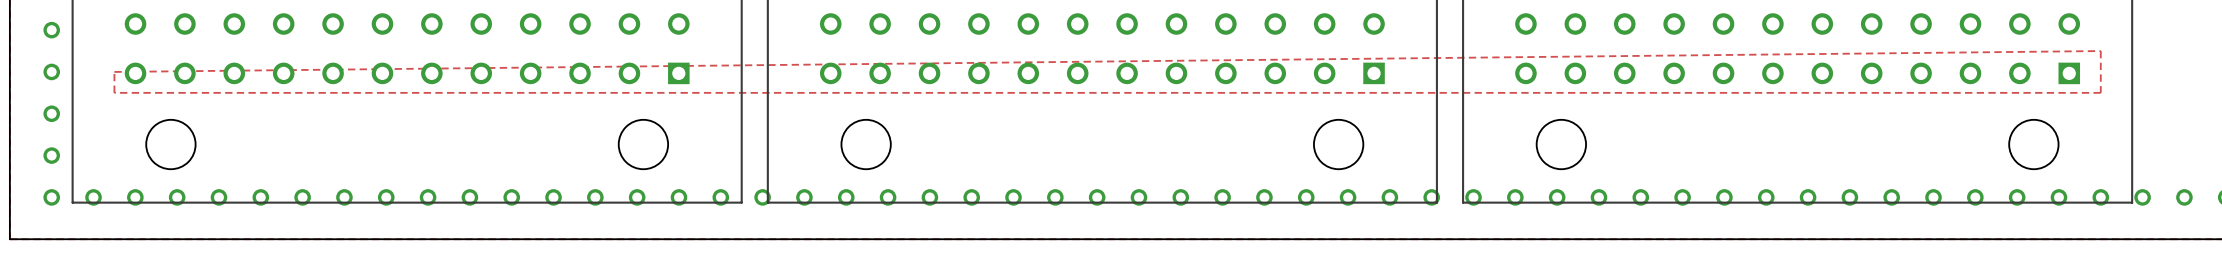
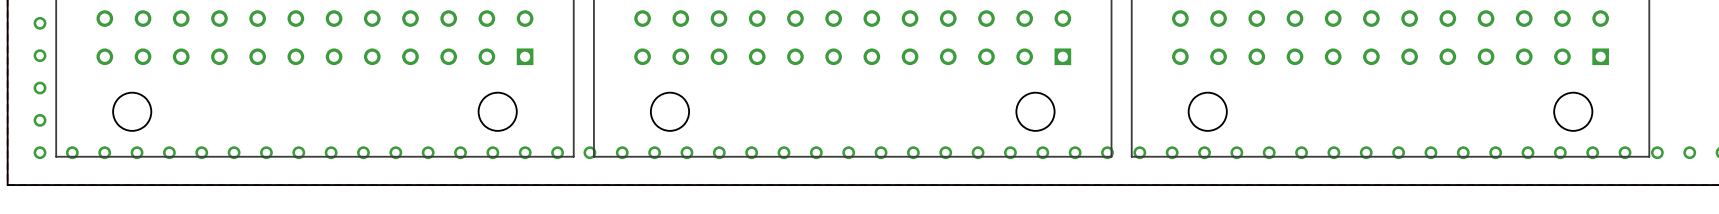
zone outline: (2100, 51) (114, 71) (114, 92) (2100, 92) (2100, 51) -> none

